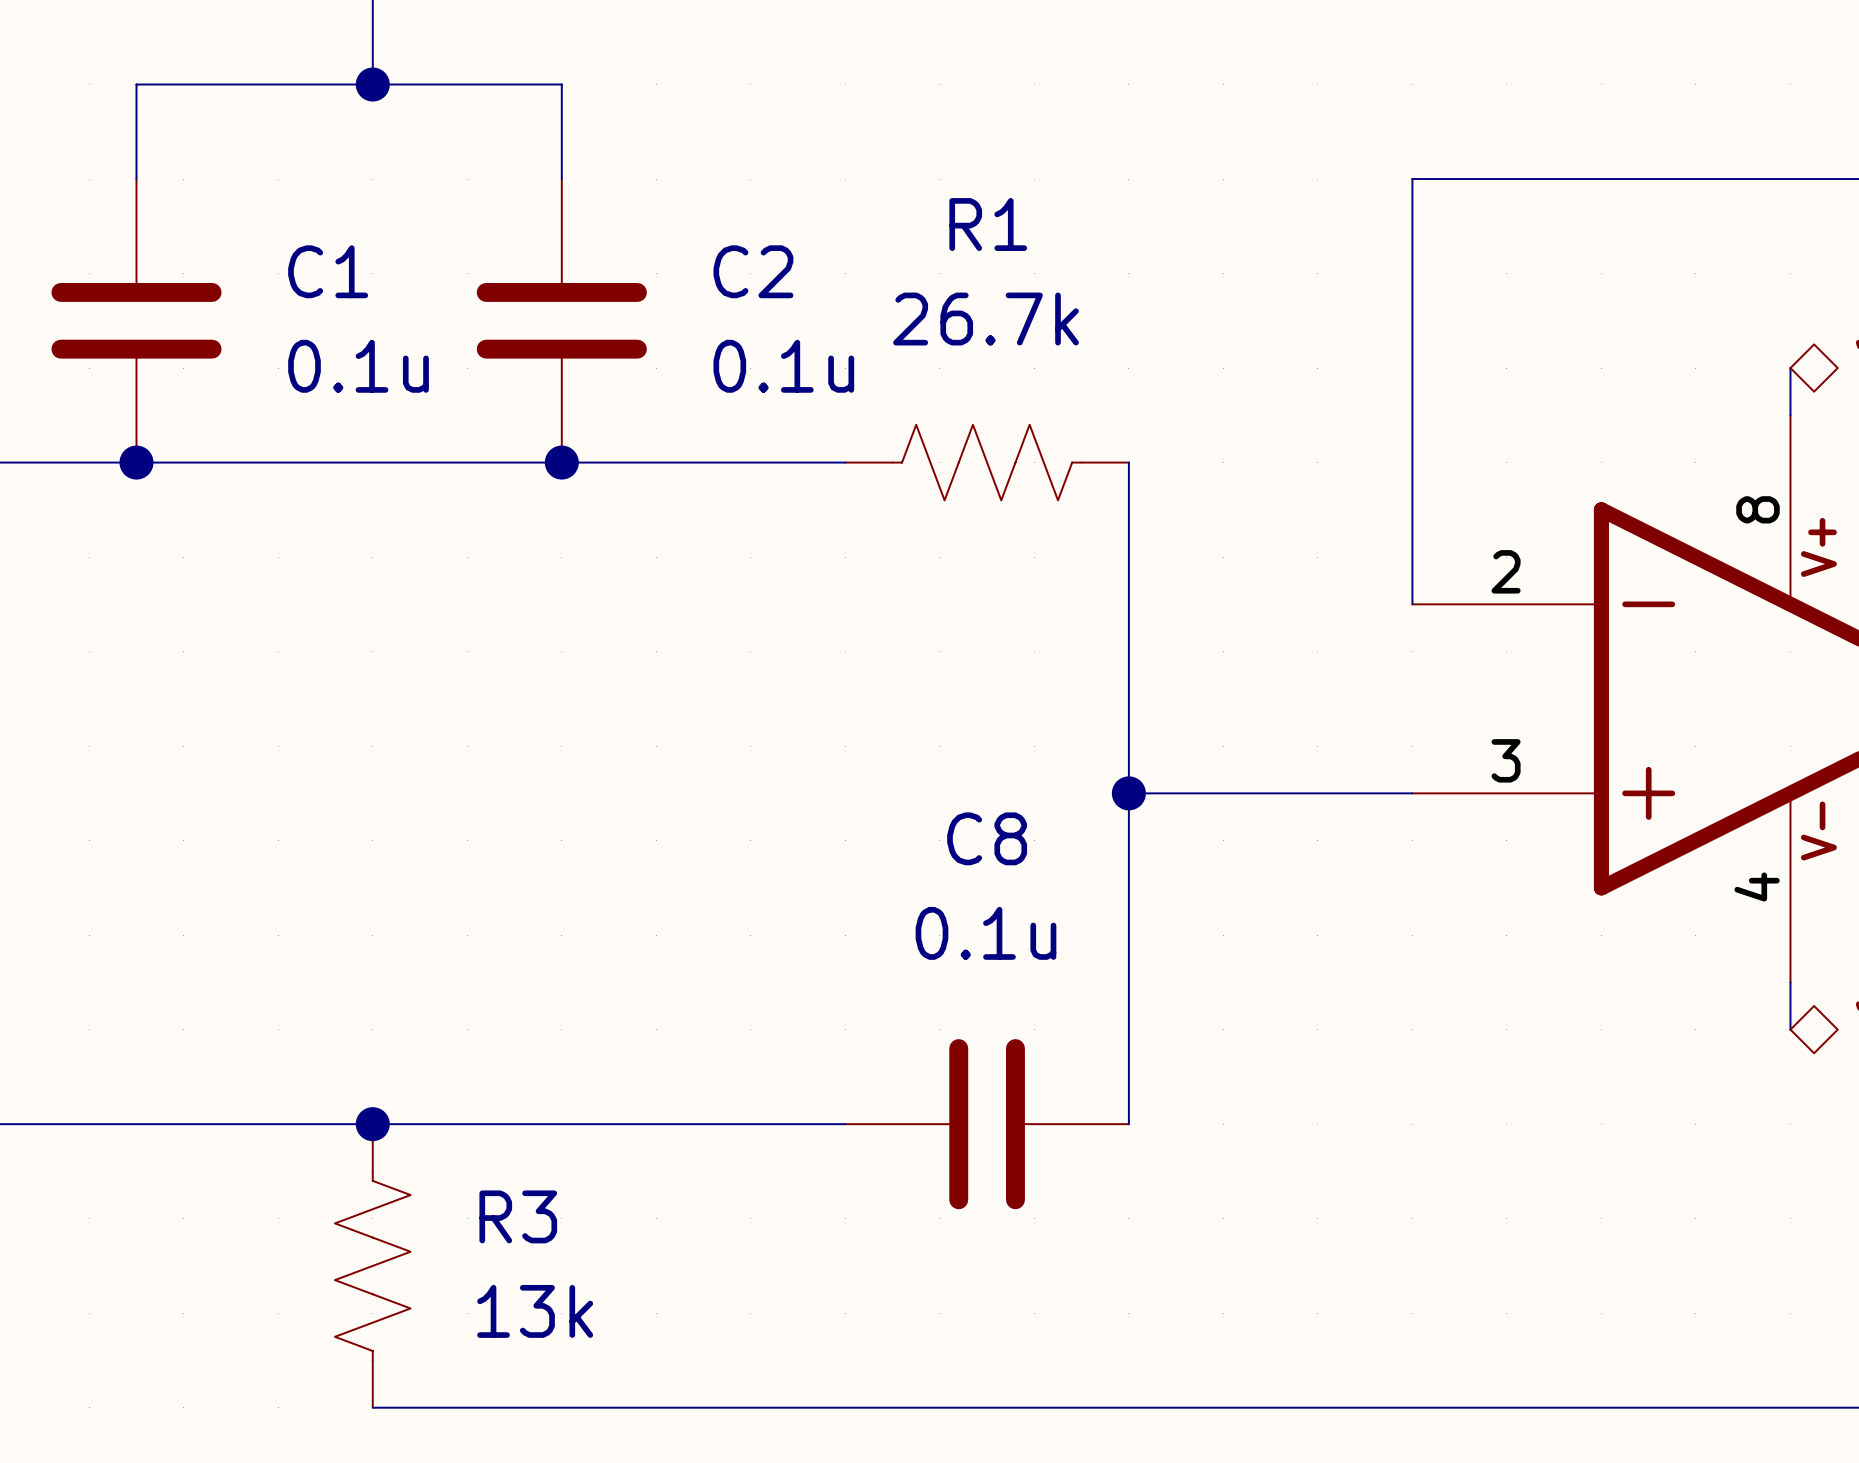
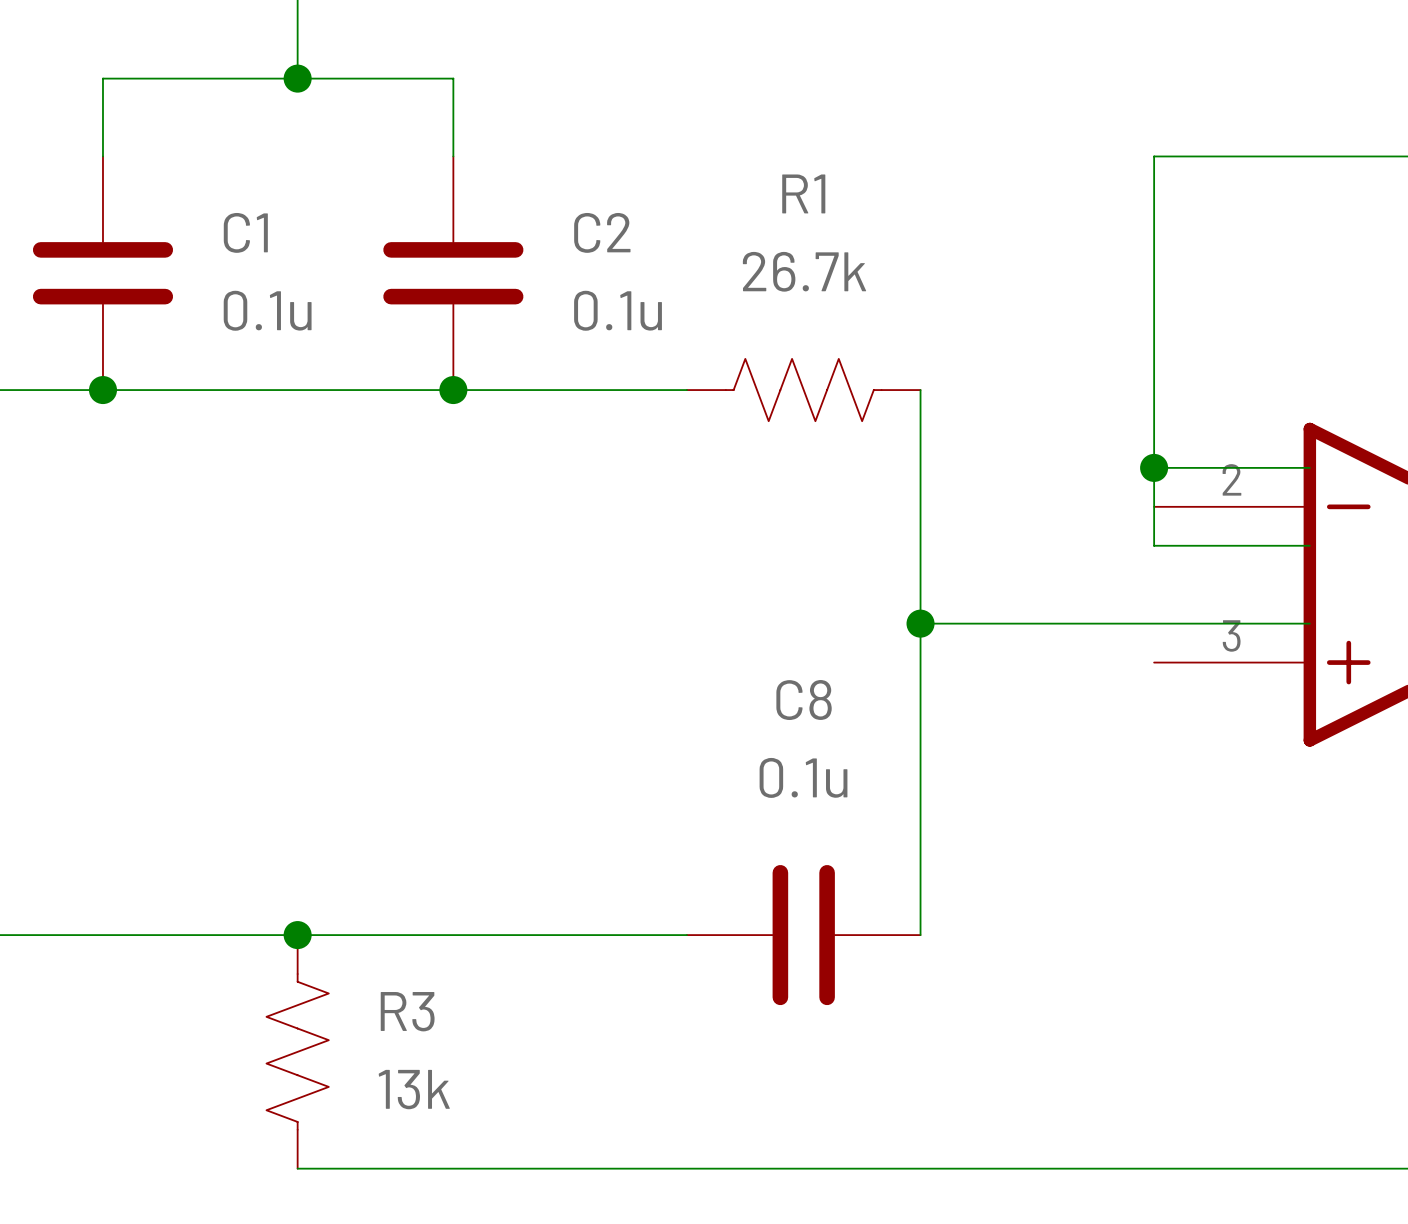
wire: none -> (1154, 467) (1309, 467)
junction: none -> (1154, 467)
wire: none -> (1154, 506) (1154, 545) (1309, 545)
wire: none -> (920, 623) (1309, 623)
wire: (1128, 793) (1412, 793) -> none
junction position: (1128, 793) -> (920, 623)

